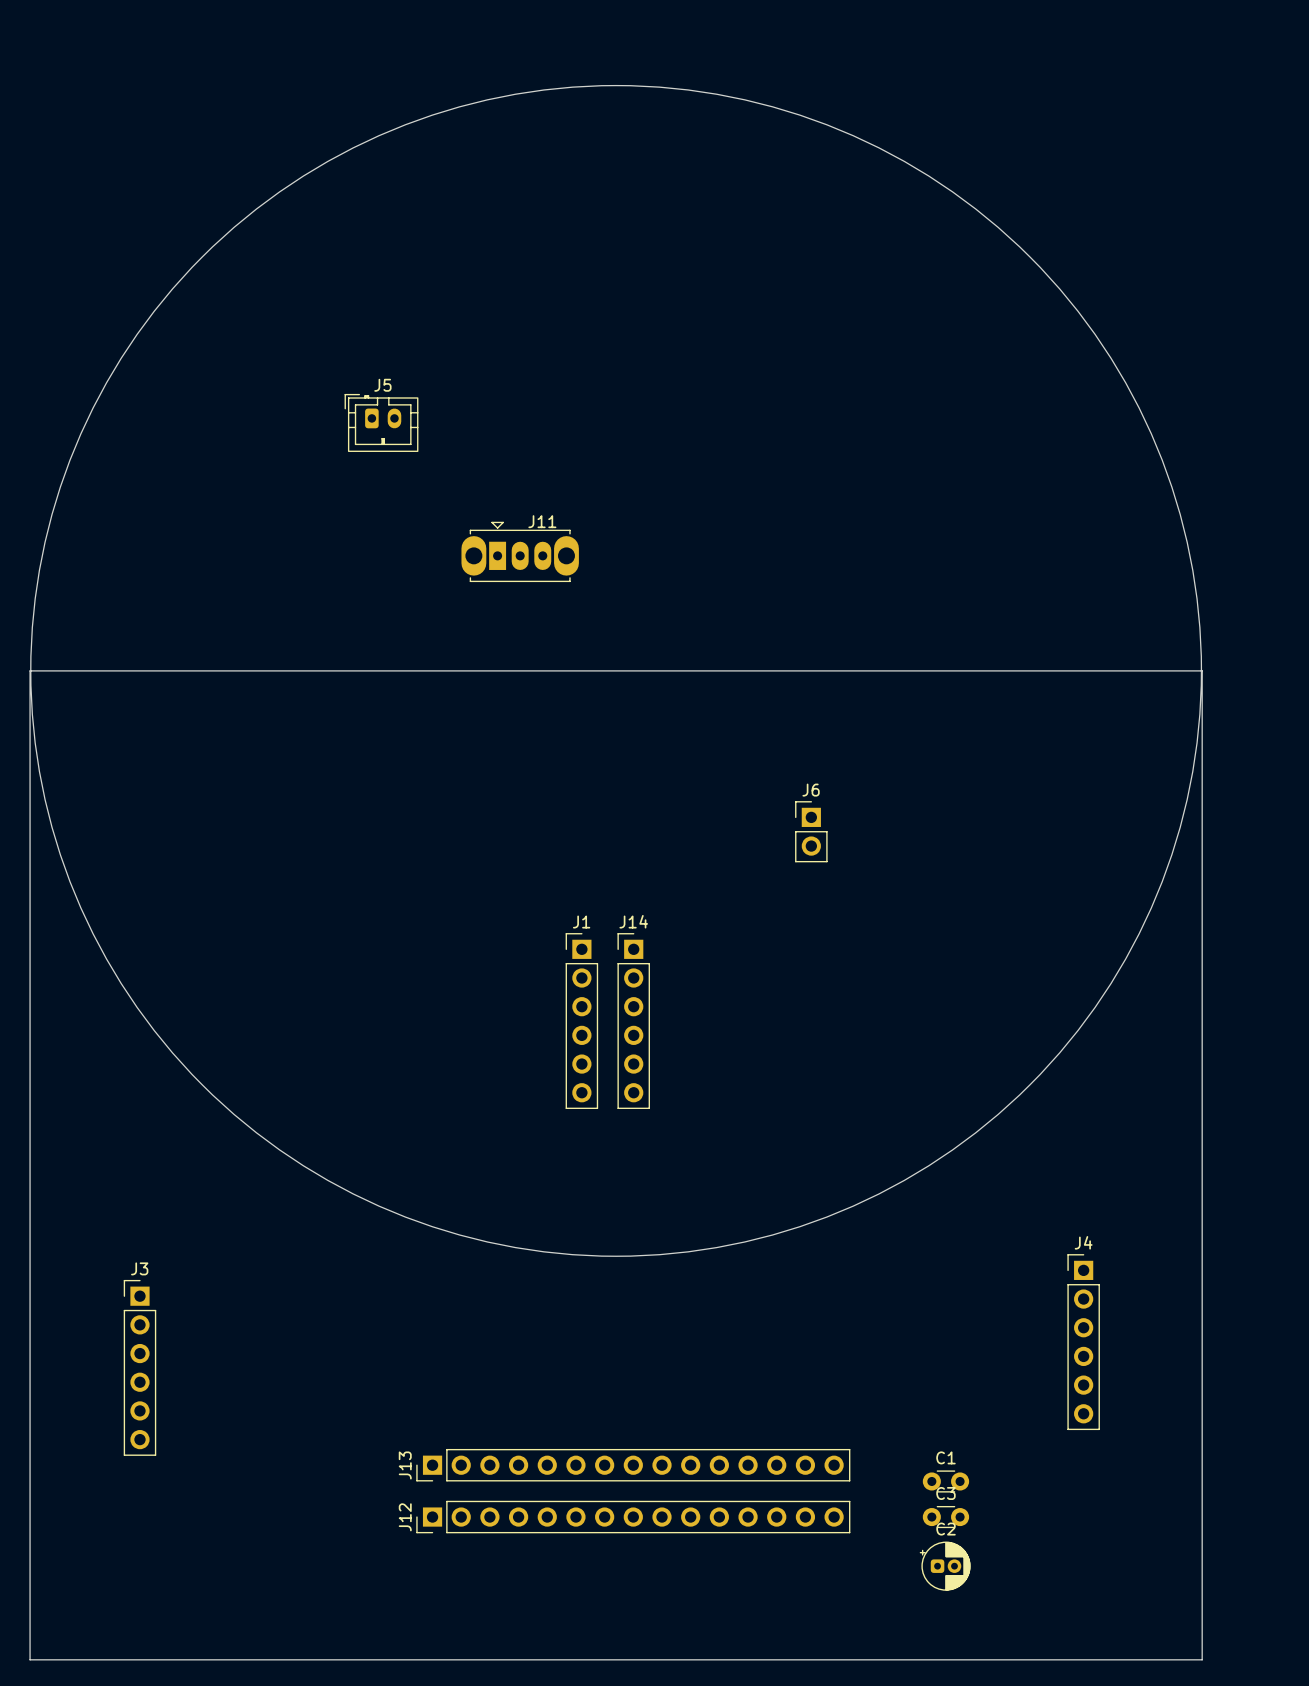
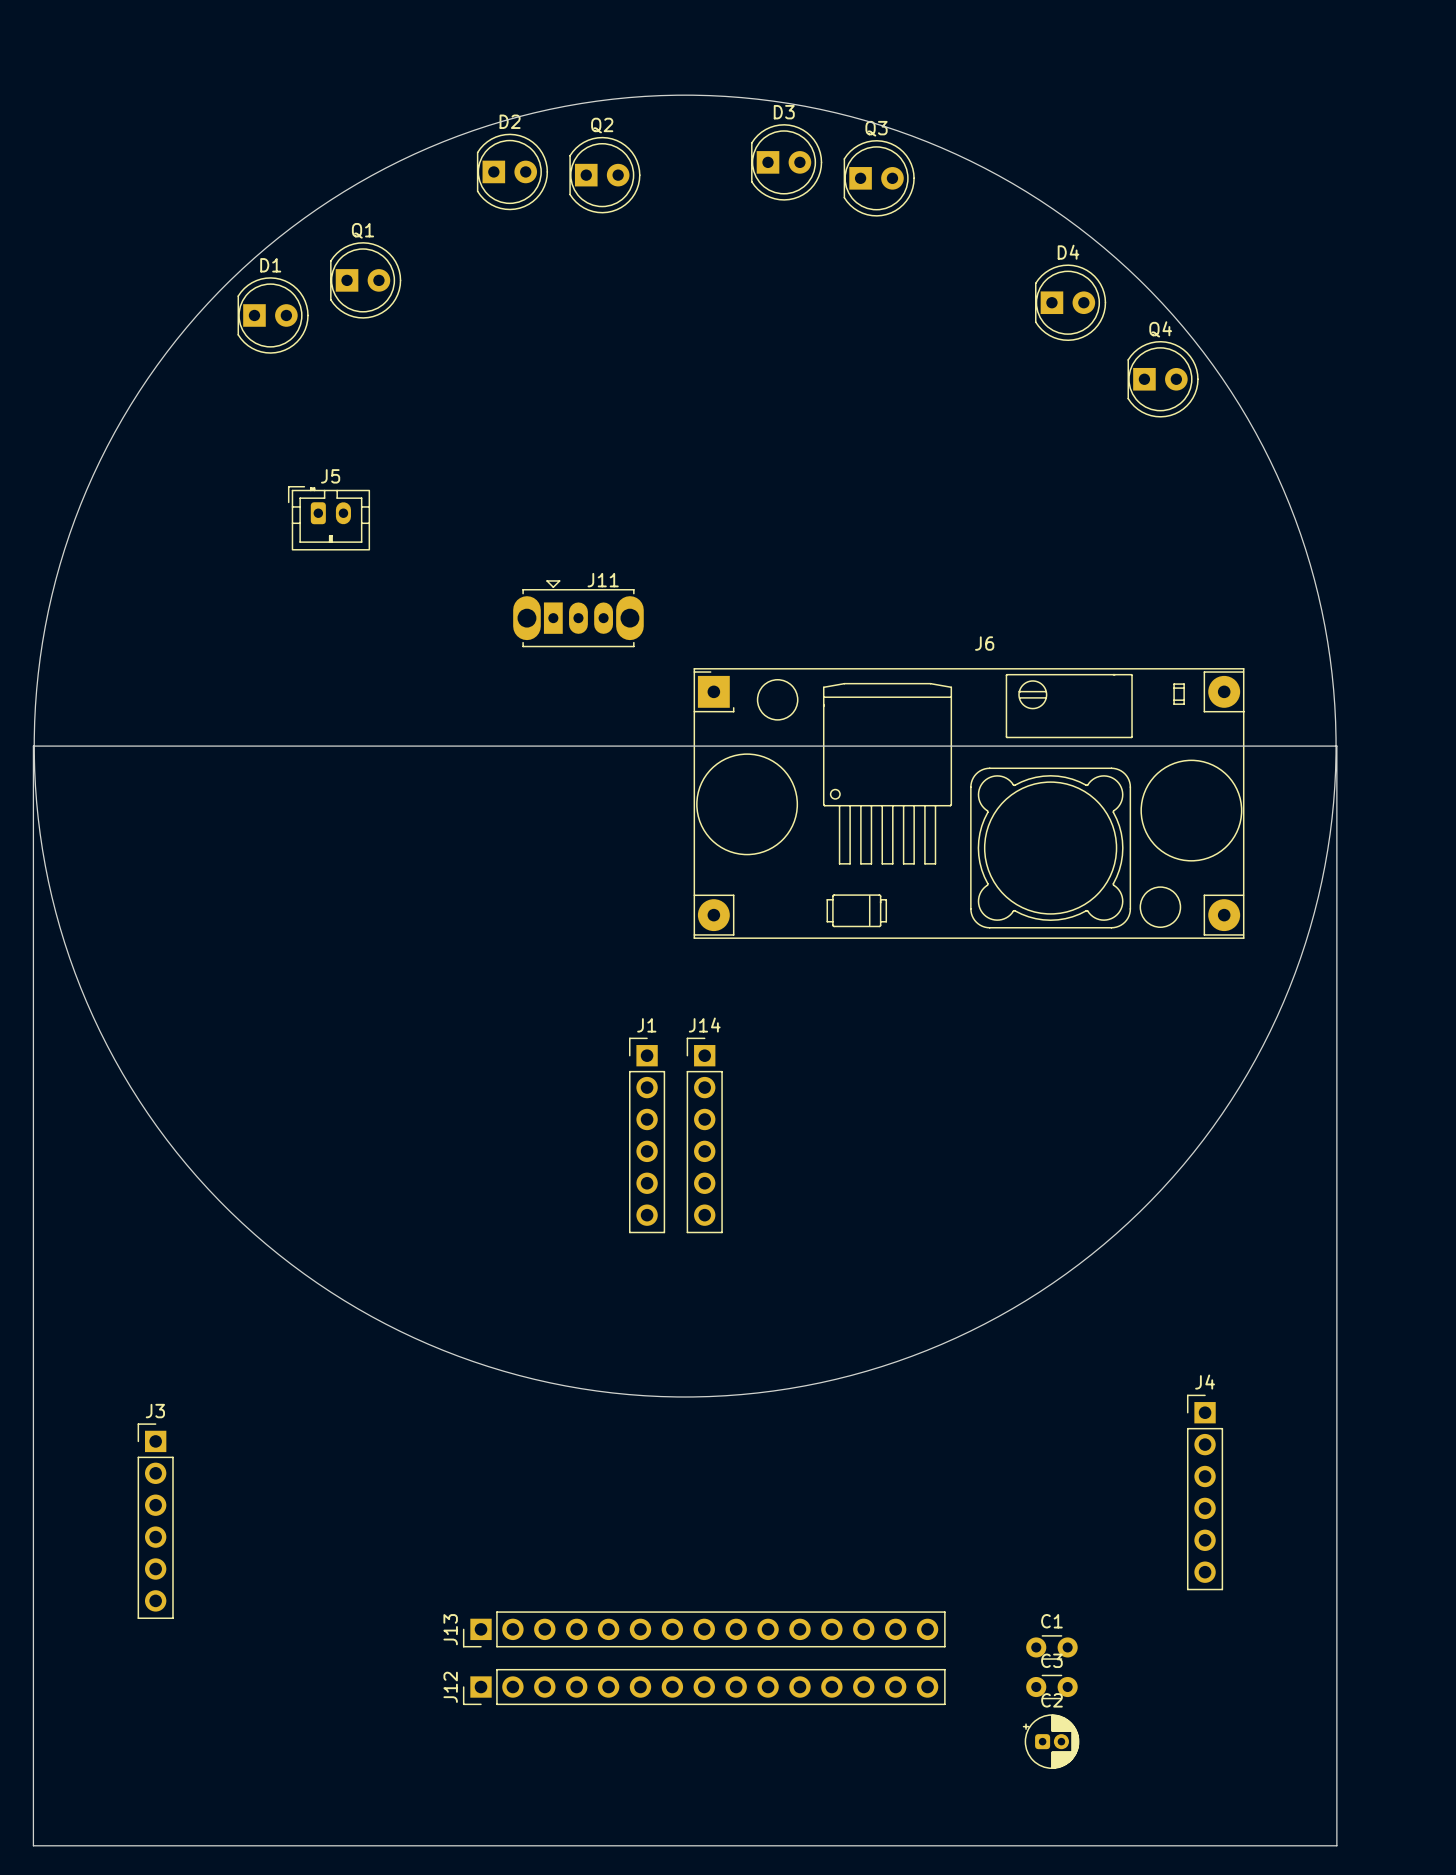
D3: none -> (786, 162)
D2: none -> (512, 171)
Q2: none -> (604, 175)
Q3: none -> (879, 178)
Q1: none -> (365, 280)
D4: none -> (1070, 302)
D1: none -> (273, 315)
Q4: none -> (1163, 379)
J5 position: (381, 422) -> (329, 518)
J6 name position: J6 (811, 790) -> J6 (984, 643)
J6 footprint: [795, 801, 828, 863] -> [693, 668, 1245, 939]

